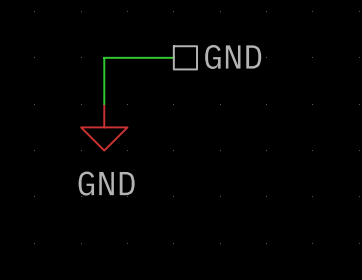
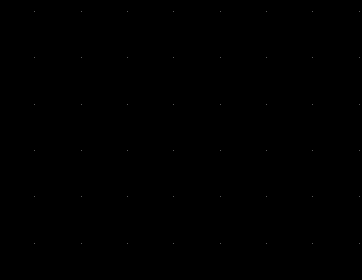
hierarchical label: GND (233, 56) -> none
wire: (173, 57) (104, 57) (104, 104) -> none
power symbol: GND (104, 127) -> none

